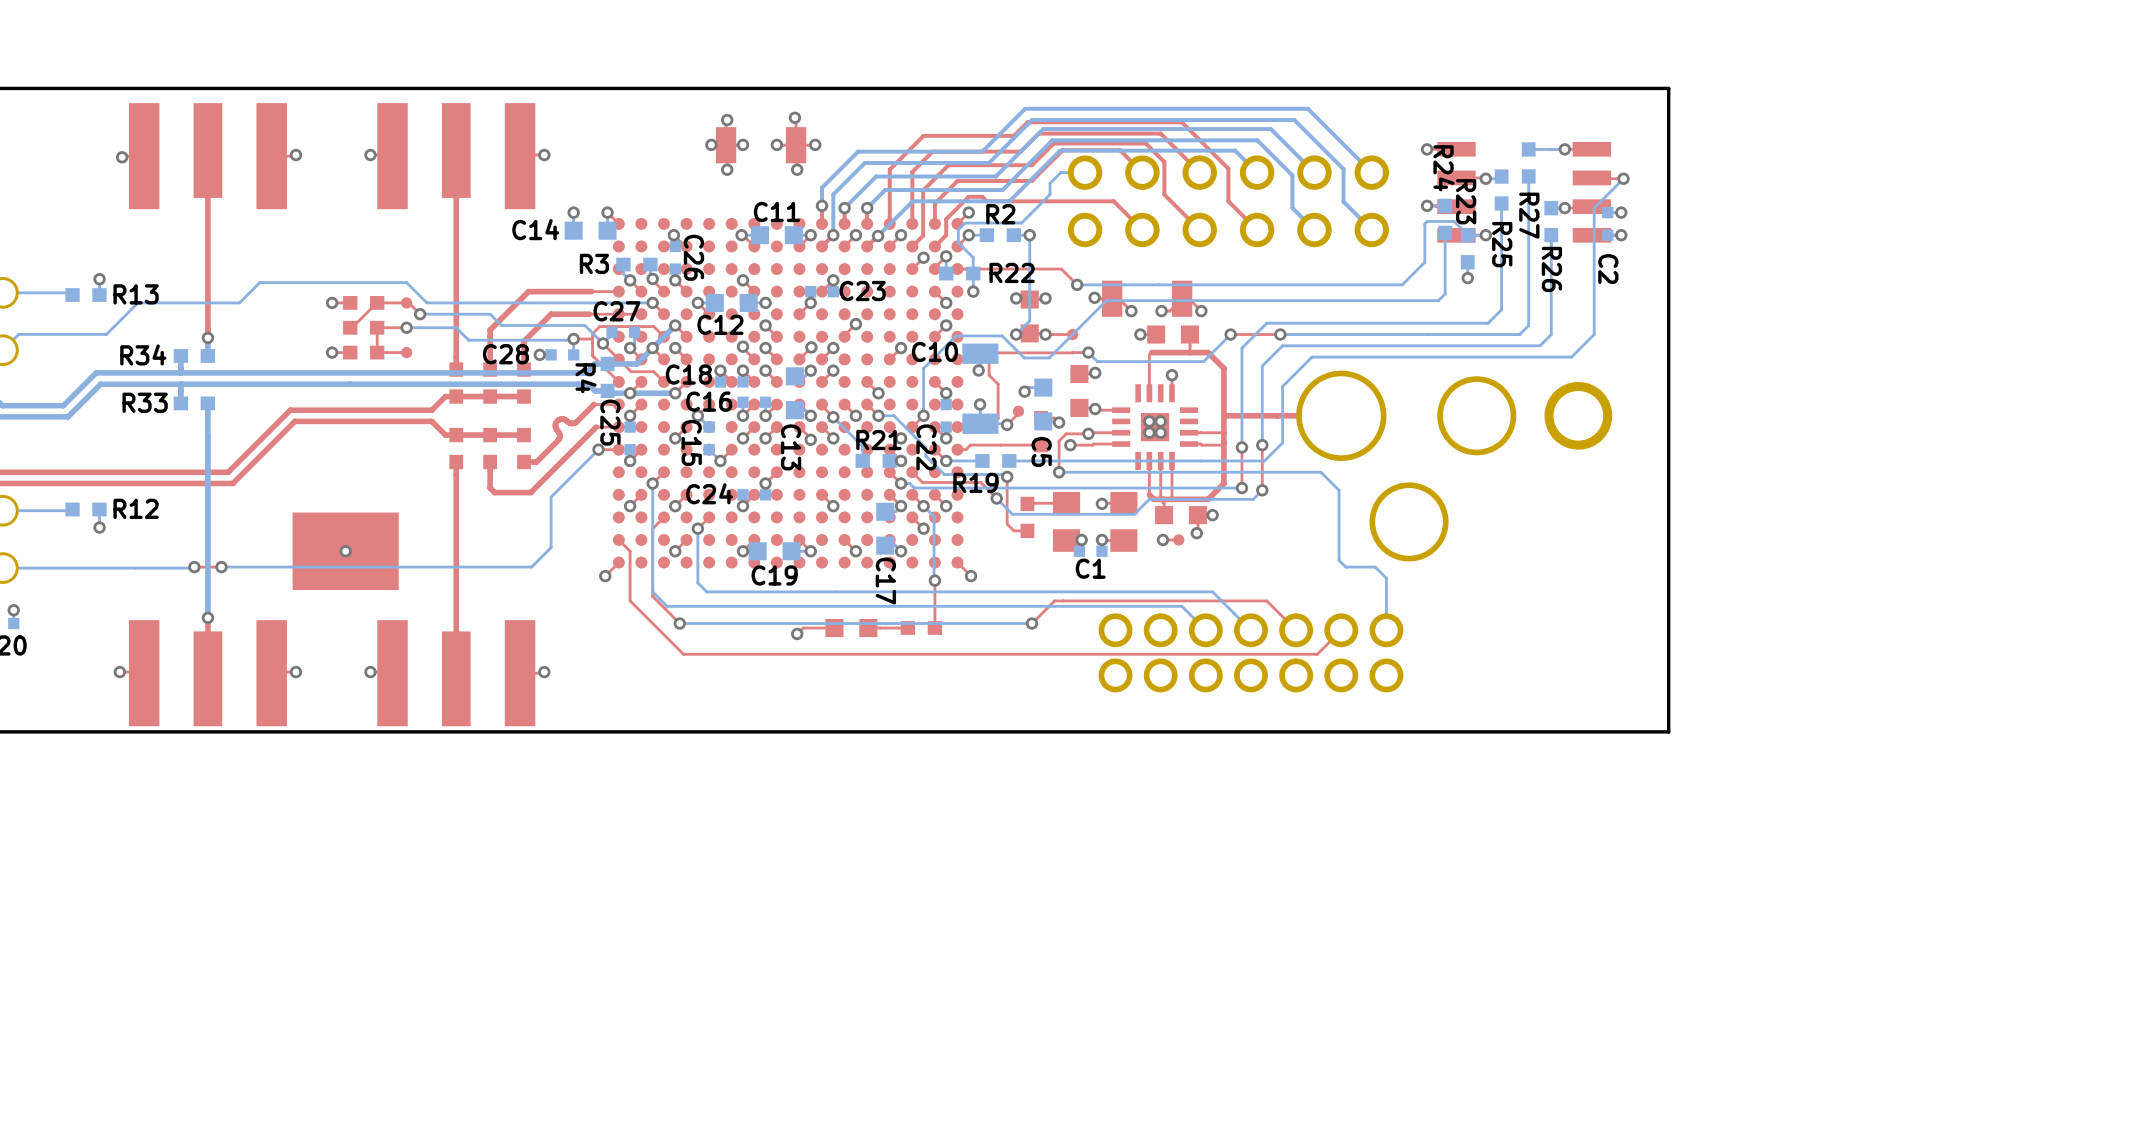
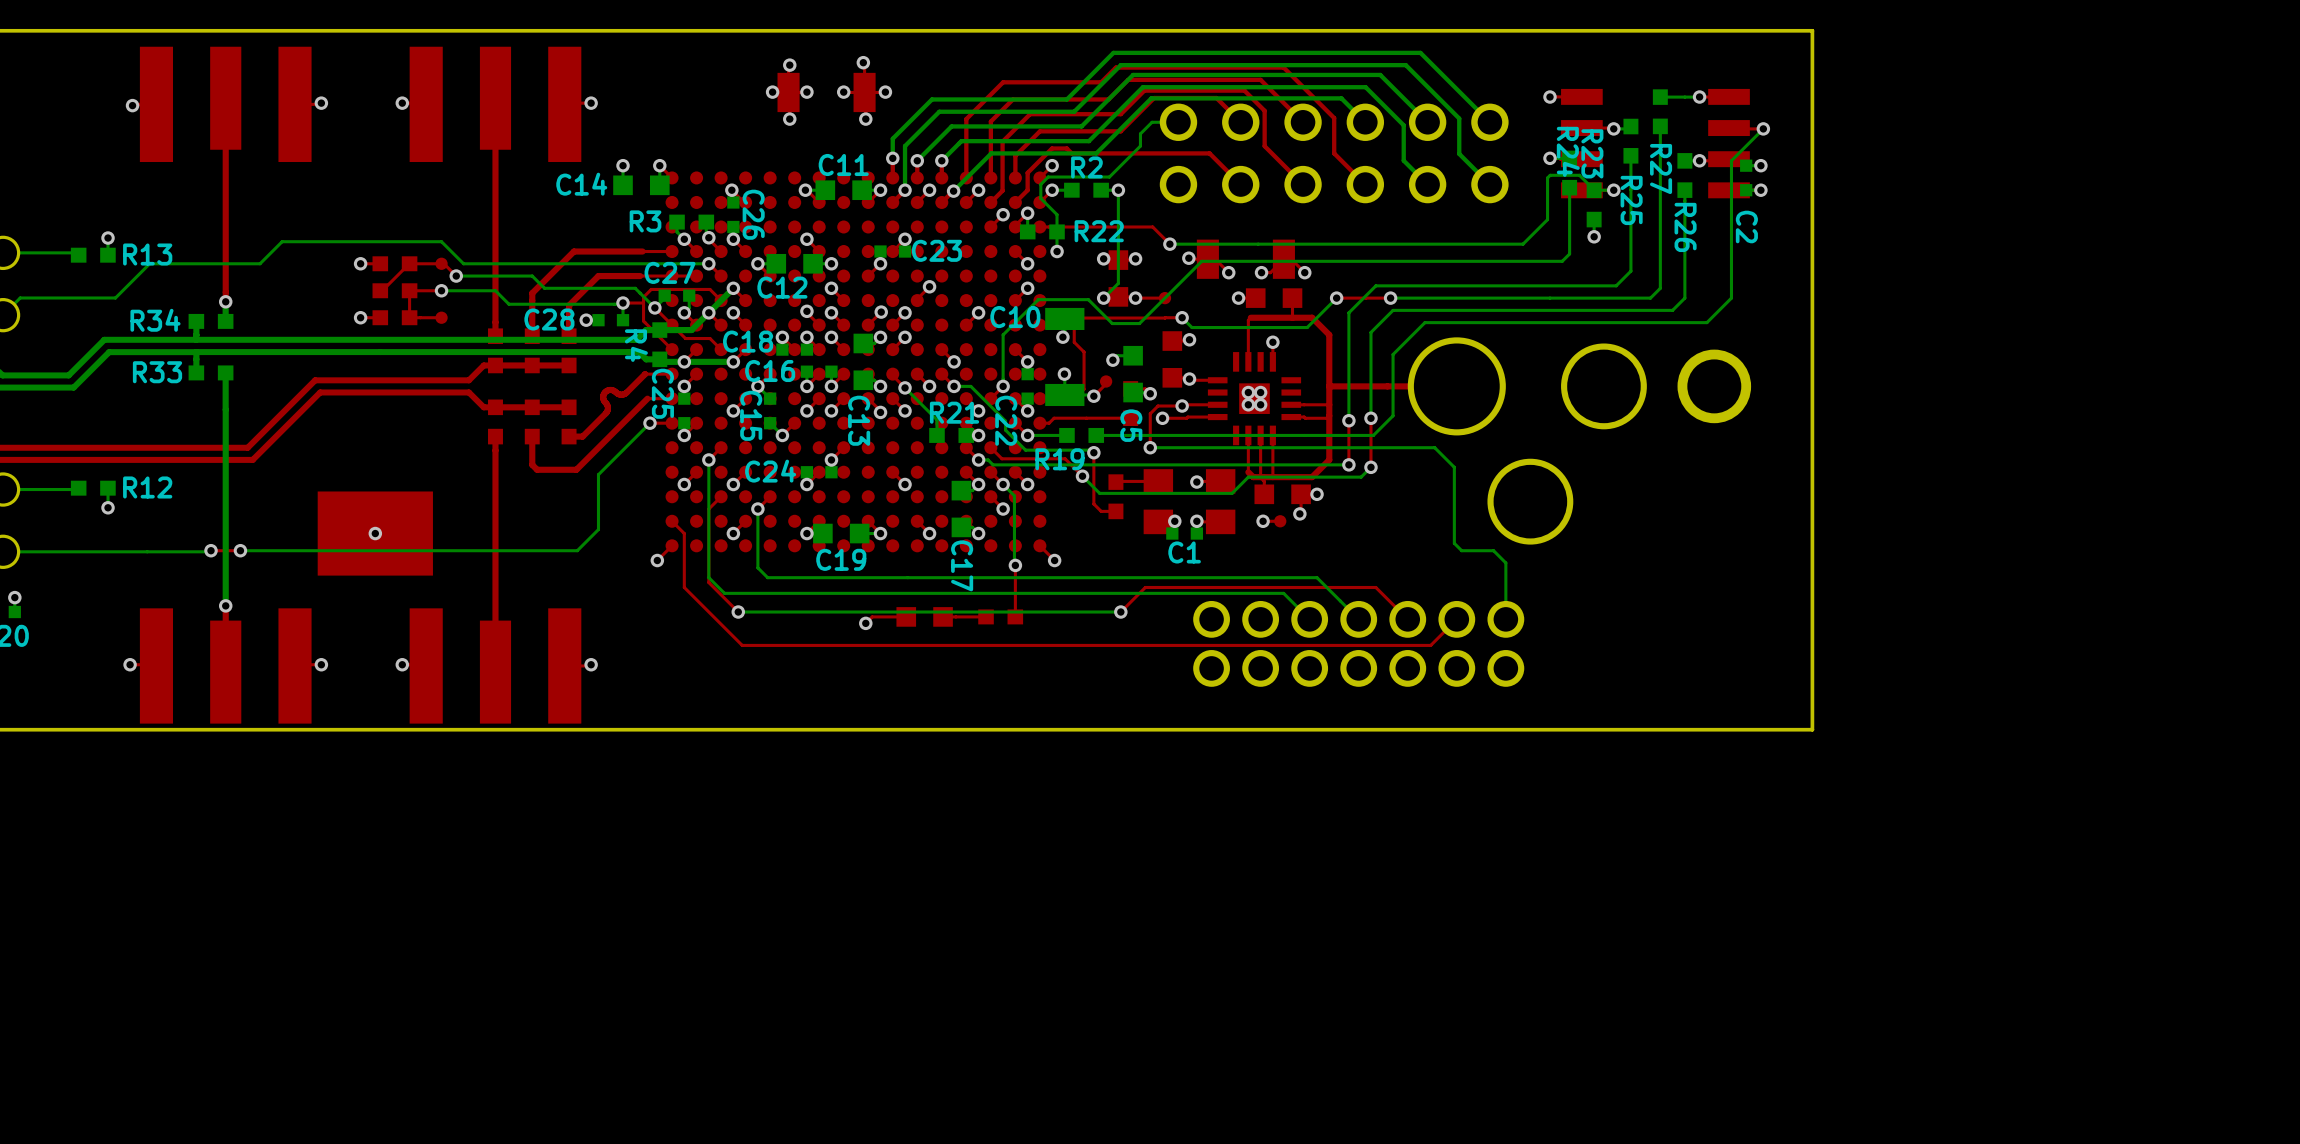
R24 name position: R24 (1443, 168) -> R24 (1568, 151)

